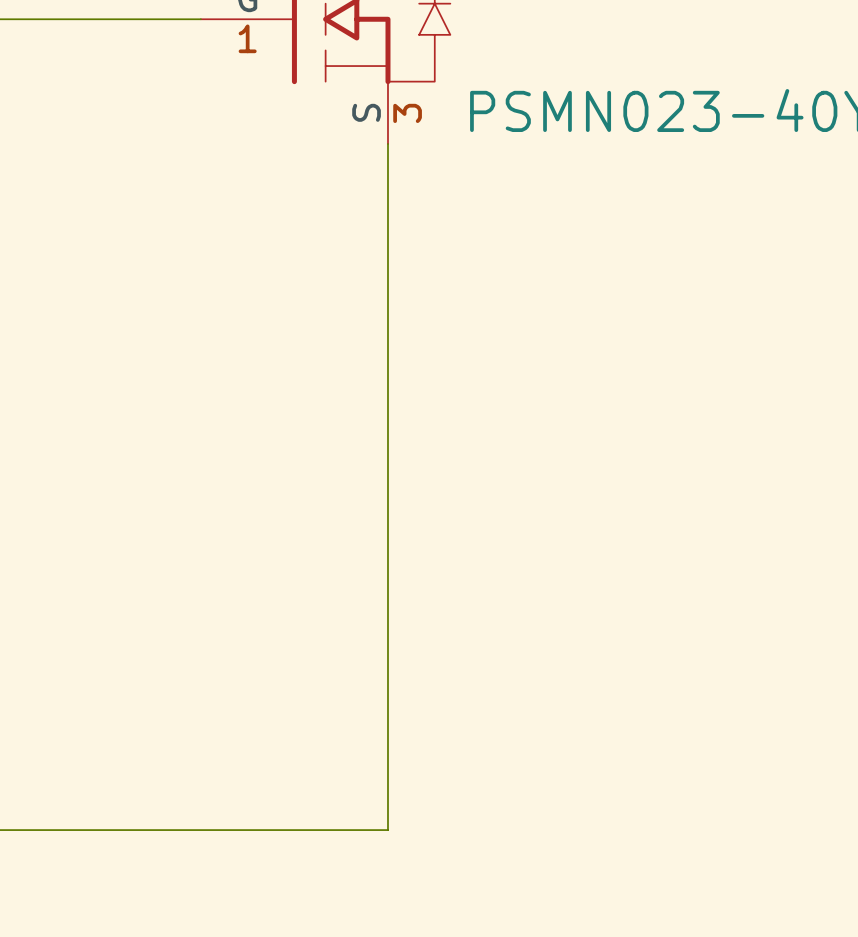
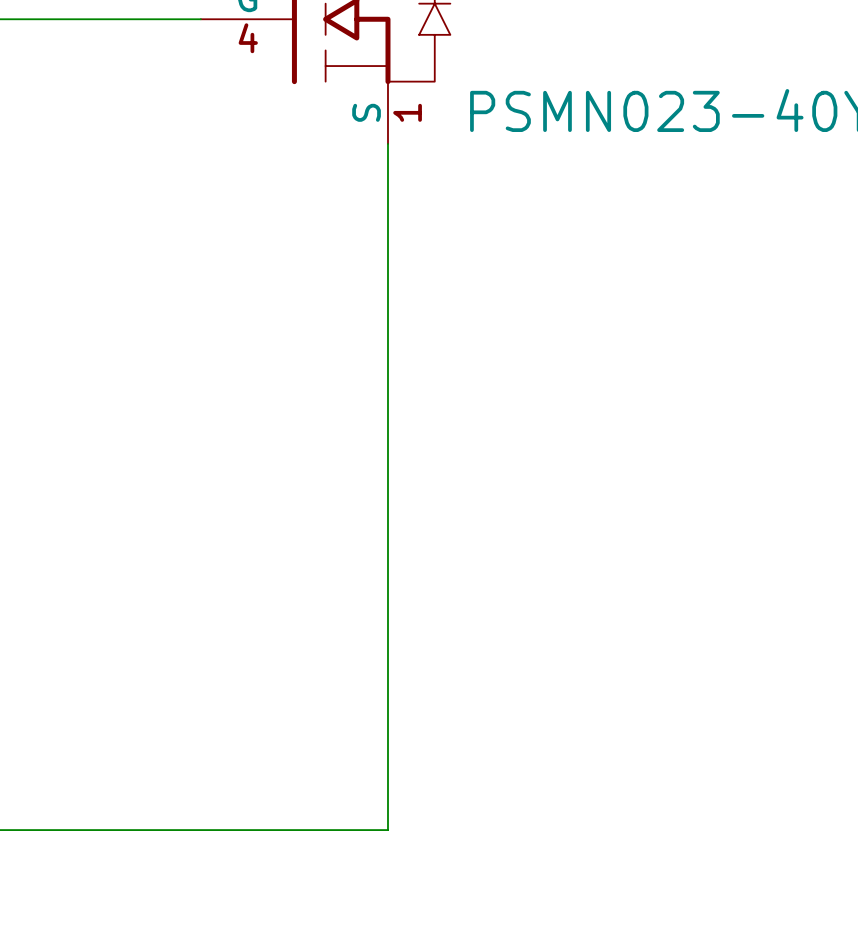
part pin number: 1 (247, 38) -> 4 (248, 38)
part pin number: 3 (407, 113) -> 1 (407, 112)

